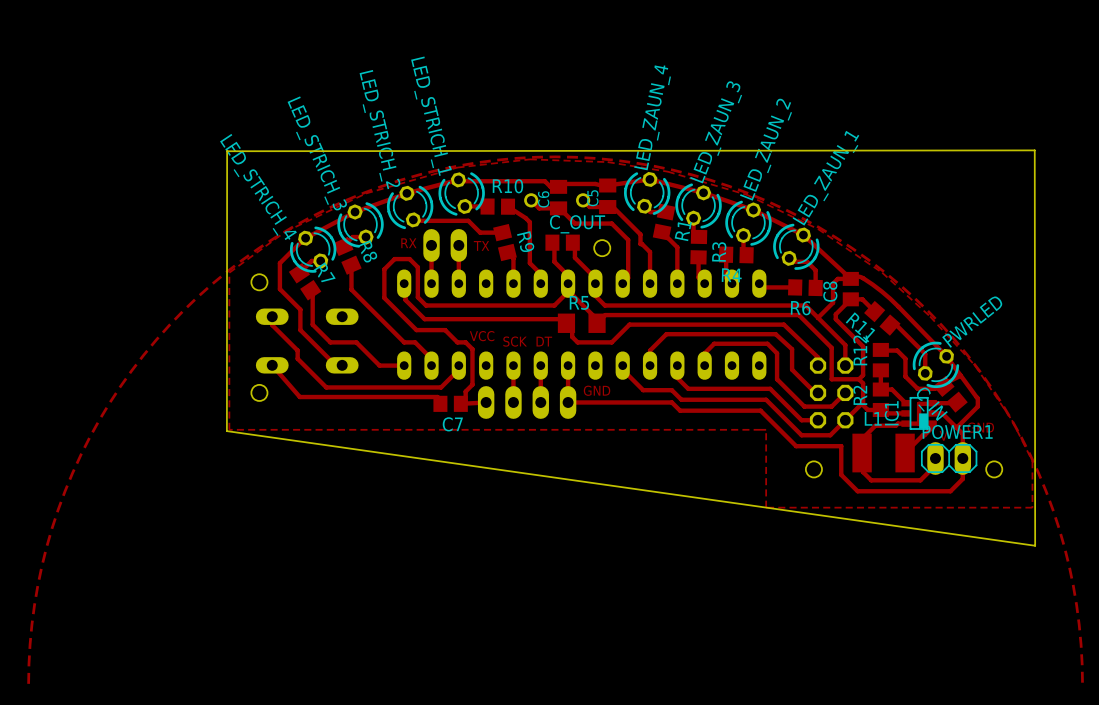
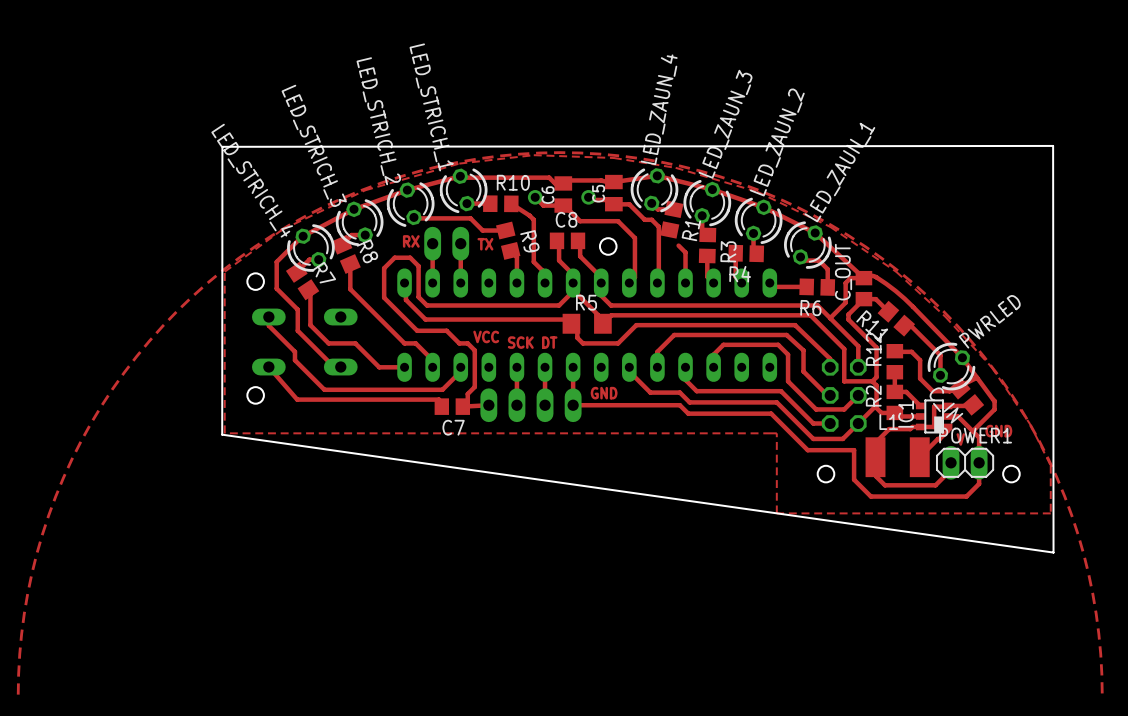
top track: (585, 202) (589, 207) (612, 207) (640, 234) (640, 244) (650, 252) (650, 283) -> (591, 199) (613, 199) (614, 204) (629, 204) (644, 219) (651, 219) (658, 226) (657, 283)
C_OUT name: C_OUT (577, 224) -> C8 (566, 219)
top track: (662, 232) (677, 247) (677, 254) -> (678, 245) (685, 252)
C8 name: C8 (830, 291) -> C_OUT (843, 272)

